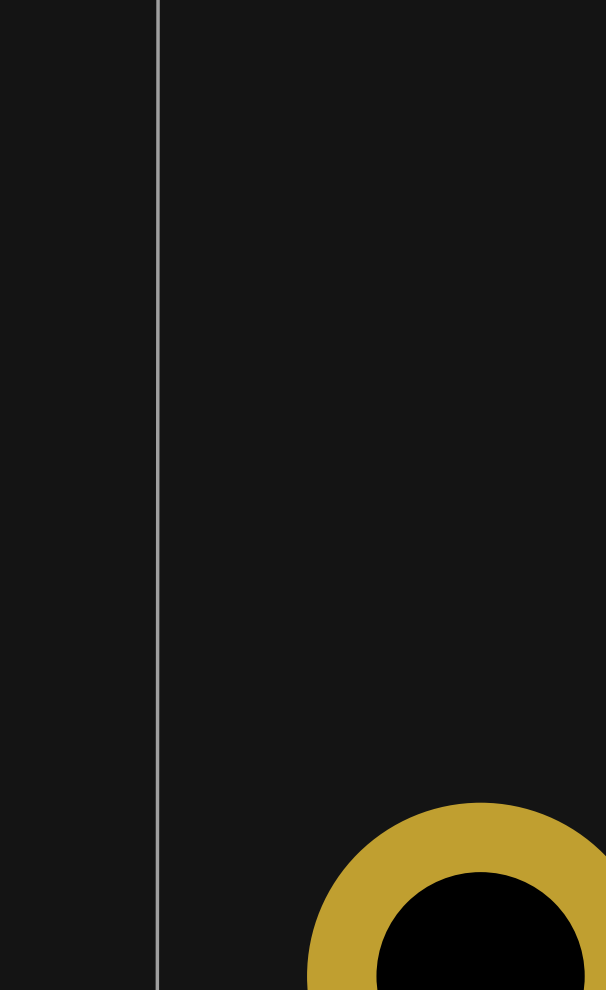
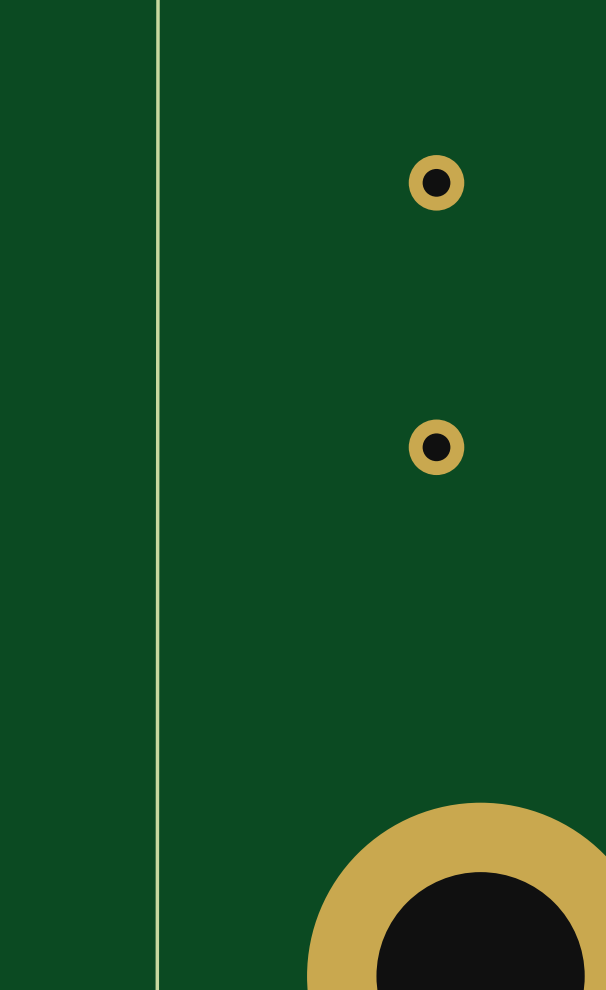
via: none -> (436, 182)
via: none -> (436, 447)

